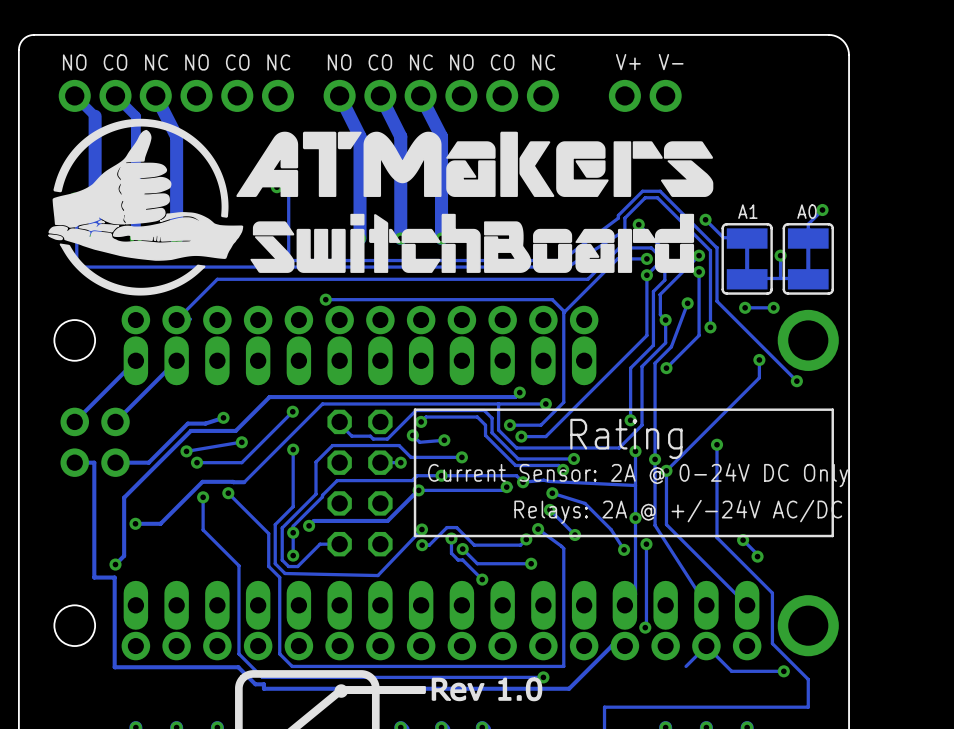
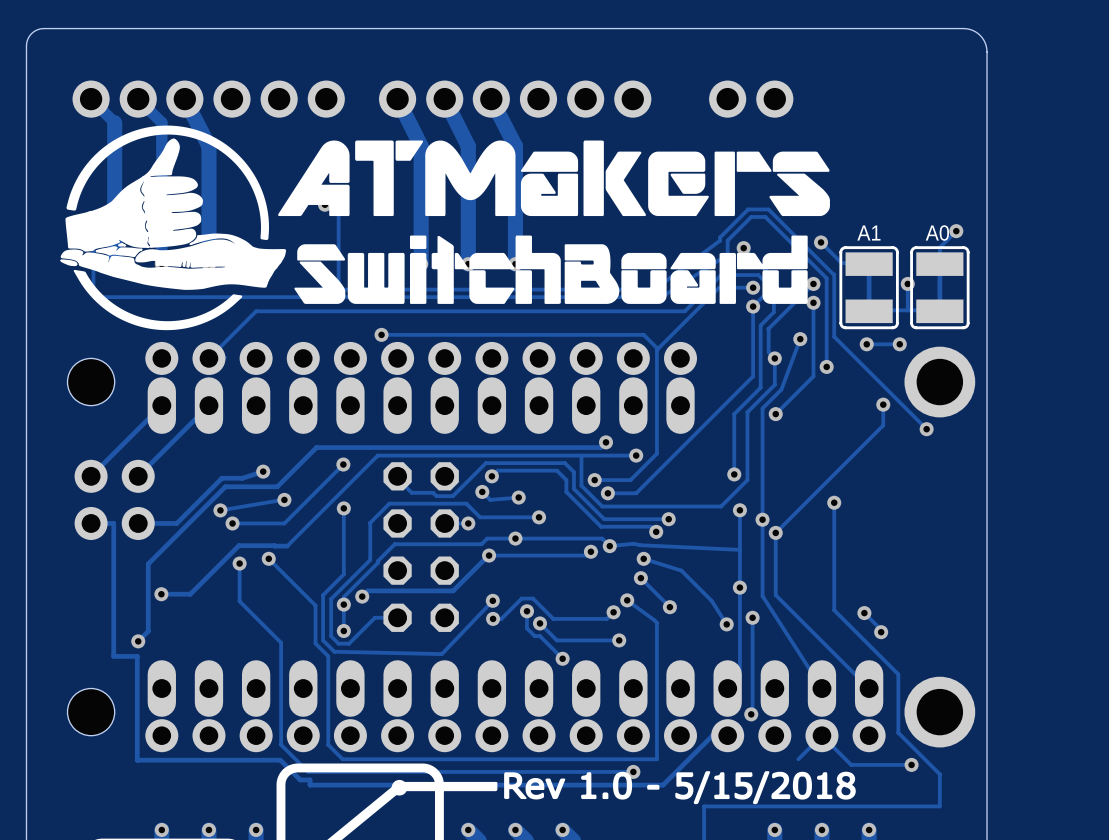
text: NO (74, 62) -> none
text: CO (115, 62) -> none
text: NC (156, 62) -> none
text: NO (196, 62) -> none
text: CO (237, 62) -> none
text: NC (278, 62) -> none
text: NO (339, 62) -> none
text: CO (380, 62) -> none
text: NC (421, 62) -> none
text: NO (461, 62) -> none
text: CO (502, 62) -> none
text: NC (543, 62) -> none
text: V+ (628, 62) -> none
text: V- (671, 62) -> none
line: (832, 409) (415, 409) (415, 536) (832, 536) (832, 409) -> none
text: Rating (626, 438) -> none
text: Current Sensor: 2A @ 0-24V DC Only (638, 475) -> none
text: Relays: 2A @ +/-24V AC/DC (678, 511) -> none
drawing: none -> [647, 771, 856, 805]

